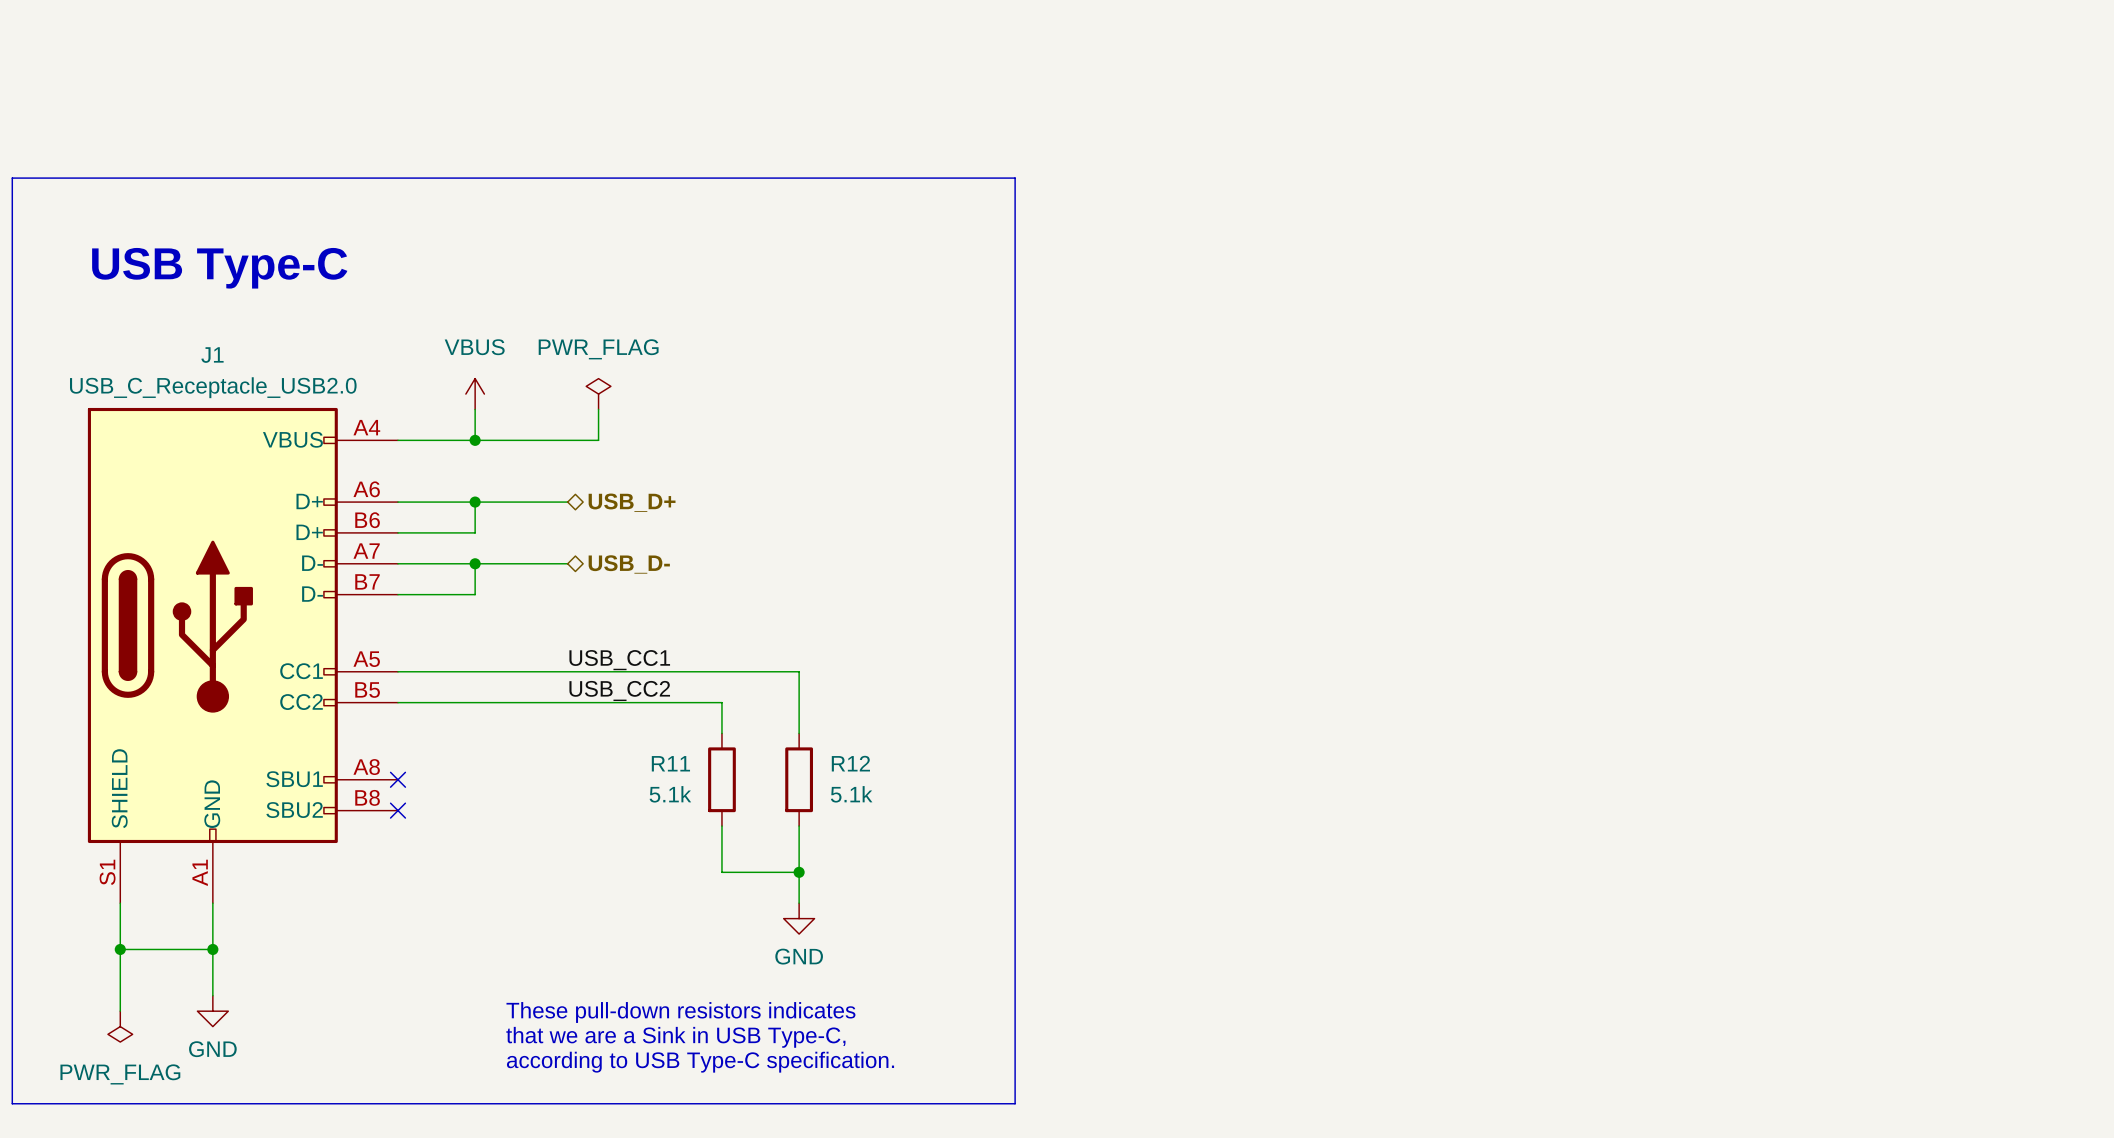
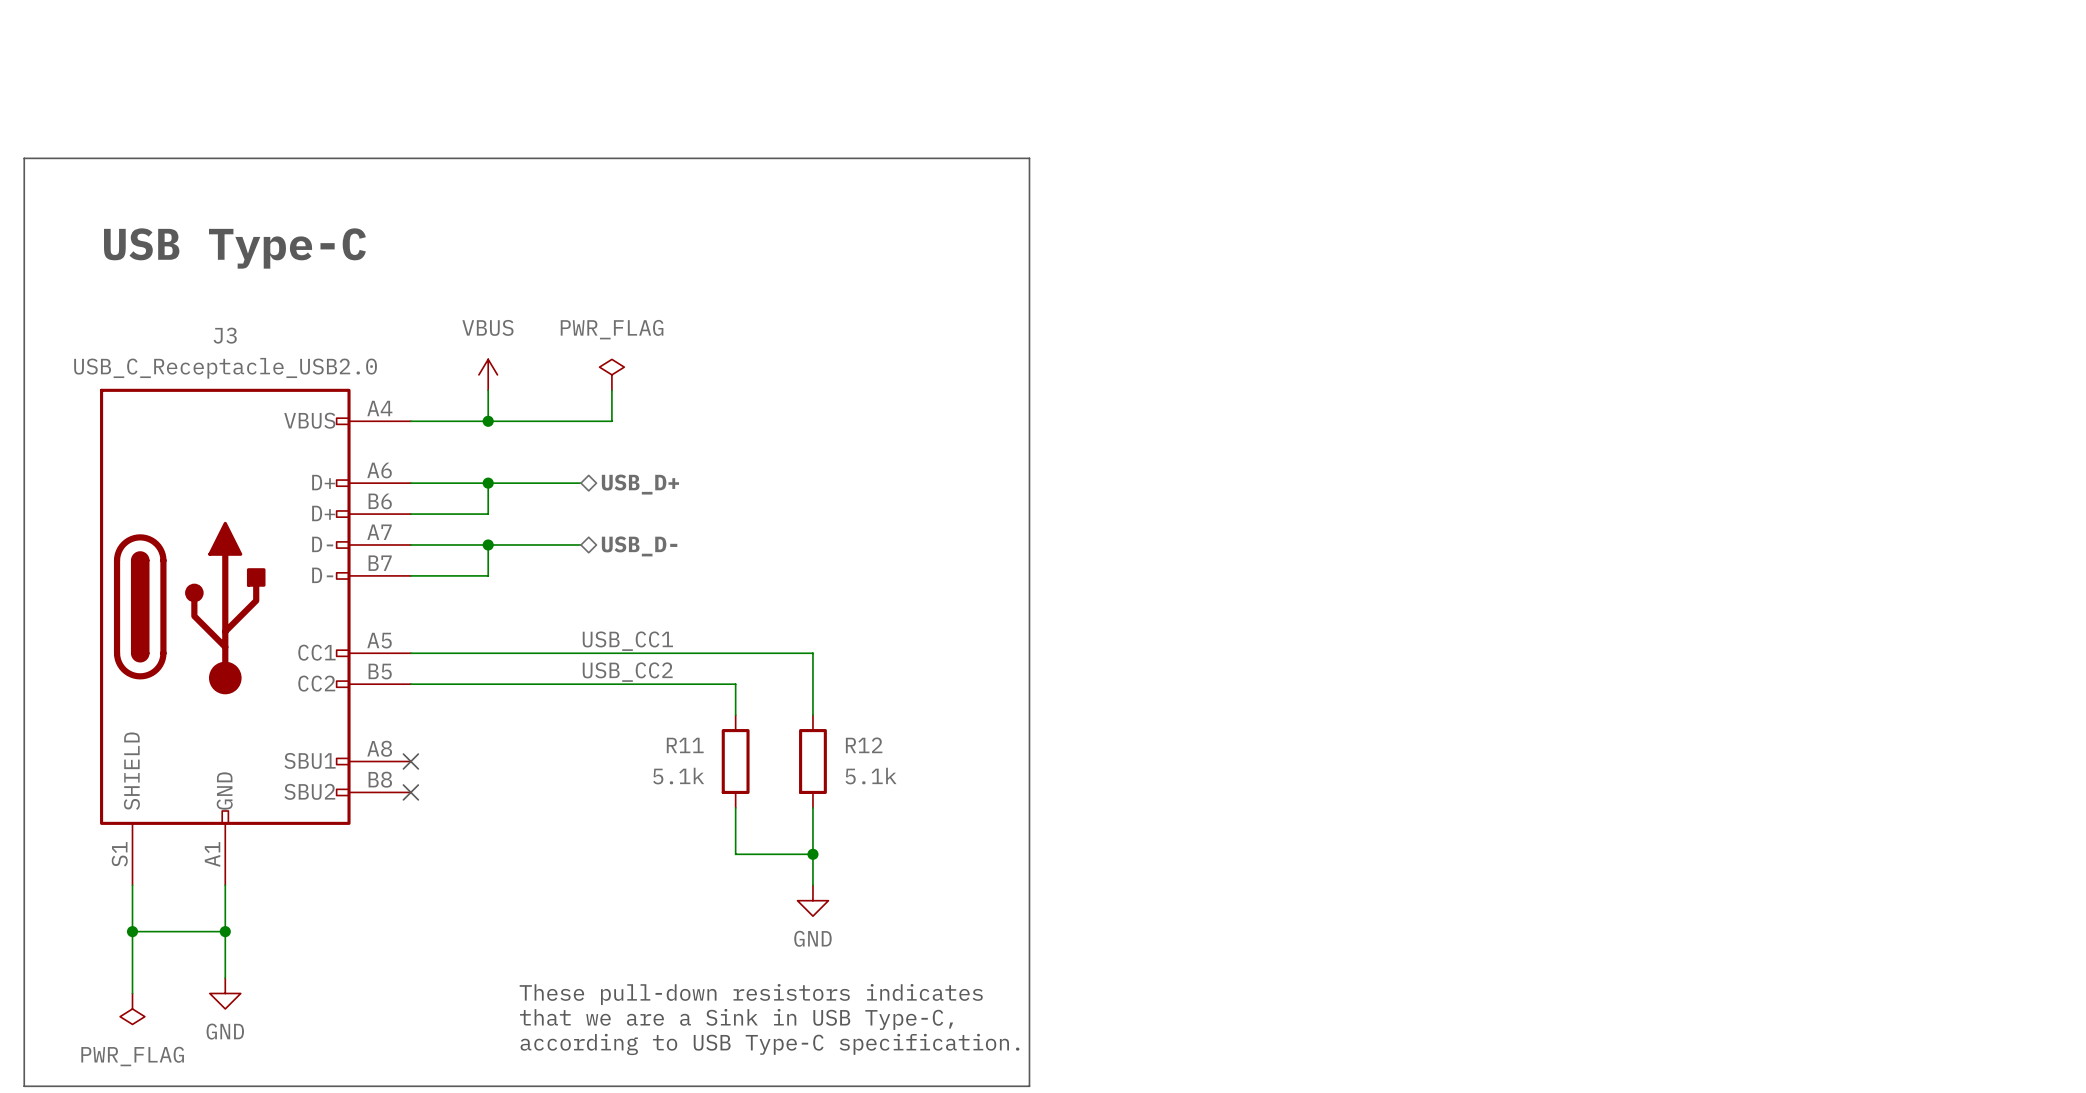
J1 name: J1 (212, 355) -> J3 (225, 335)

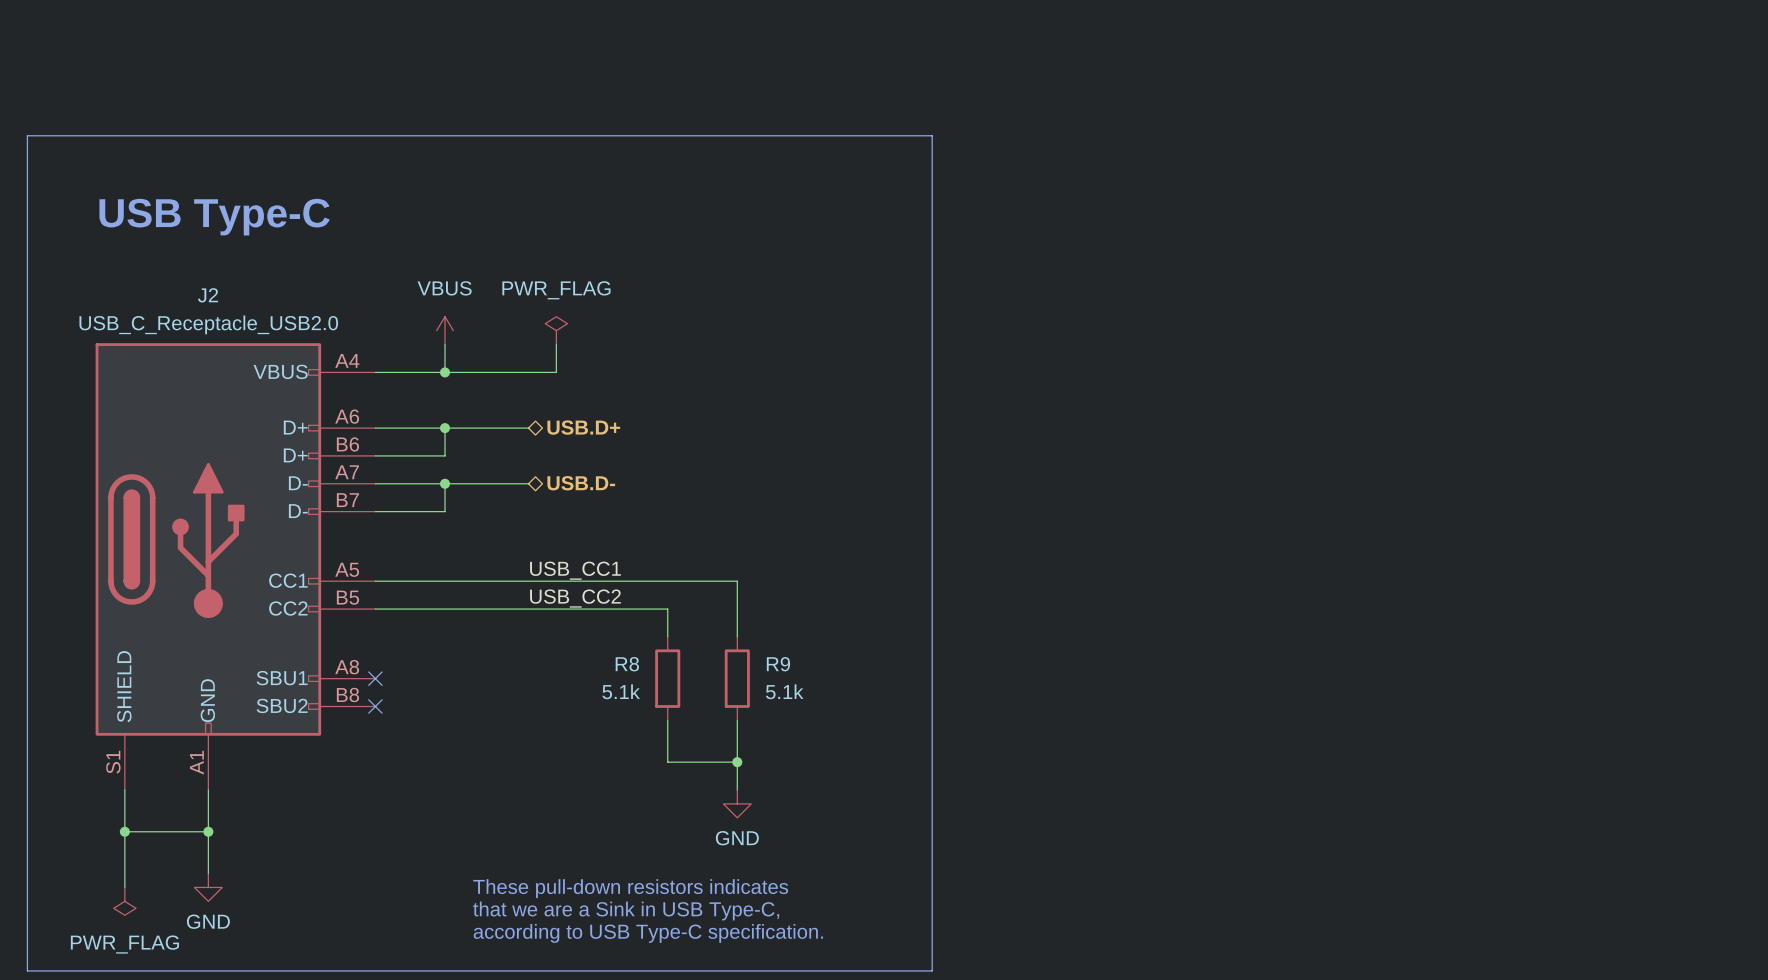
J3 name: J3 (225, 335) -> J2 (208, 295)
hierarchical label: USB_D+ (640, 484) -> USB.D+ (583, 427)
hierarchical label: USB_D- (639, 546) -> USB.D- (581, 483)
R11 name: R11 (685, 745) -> R8 (627, 664)
R12 name: R12 (864, 745) -> R9 (778, 664)

